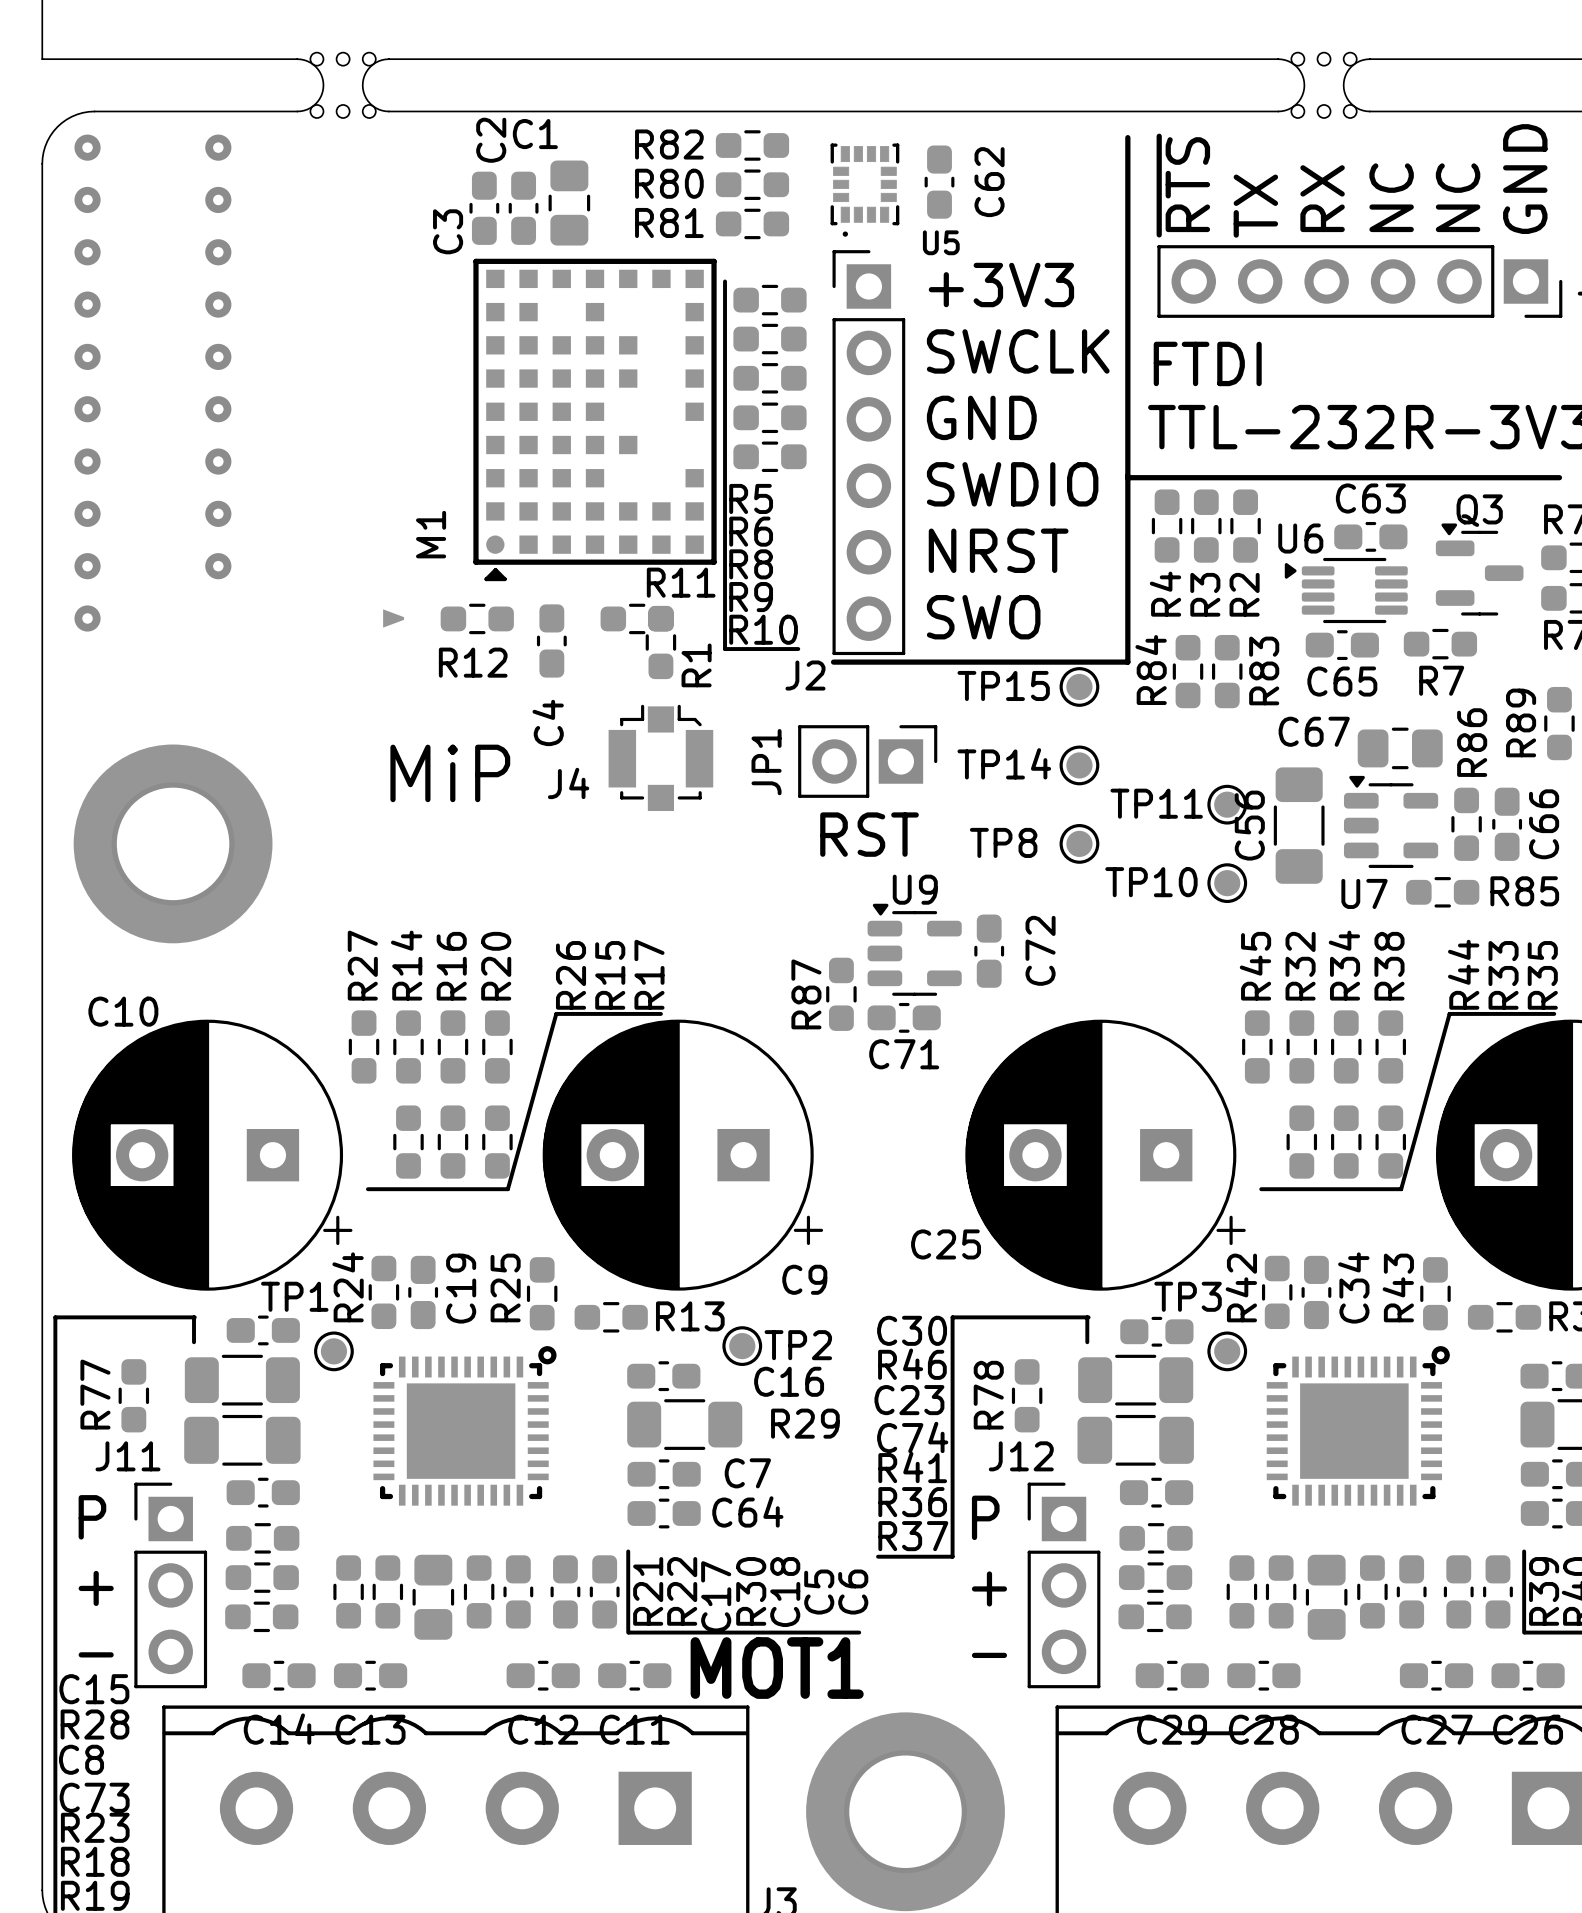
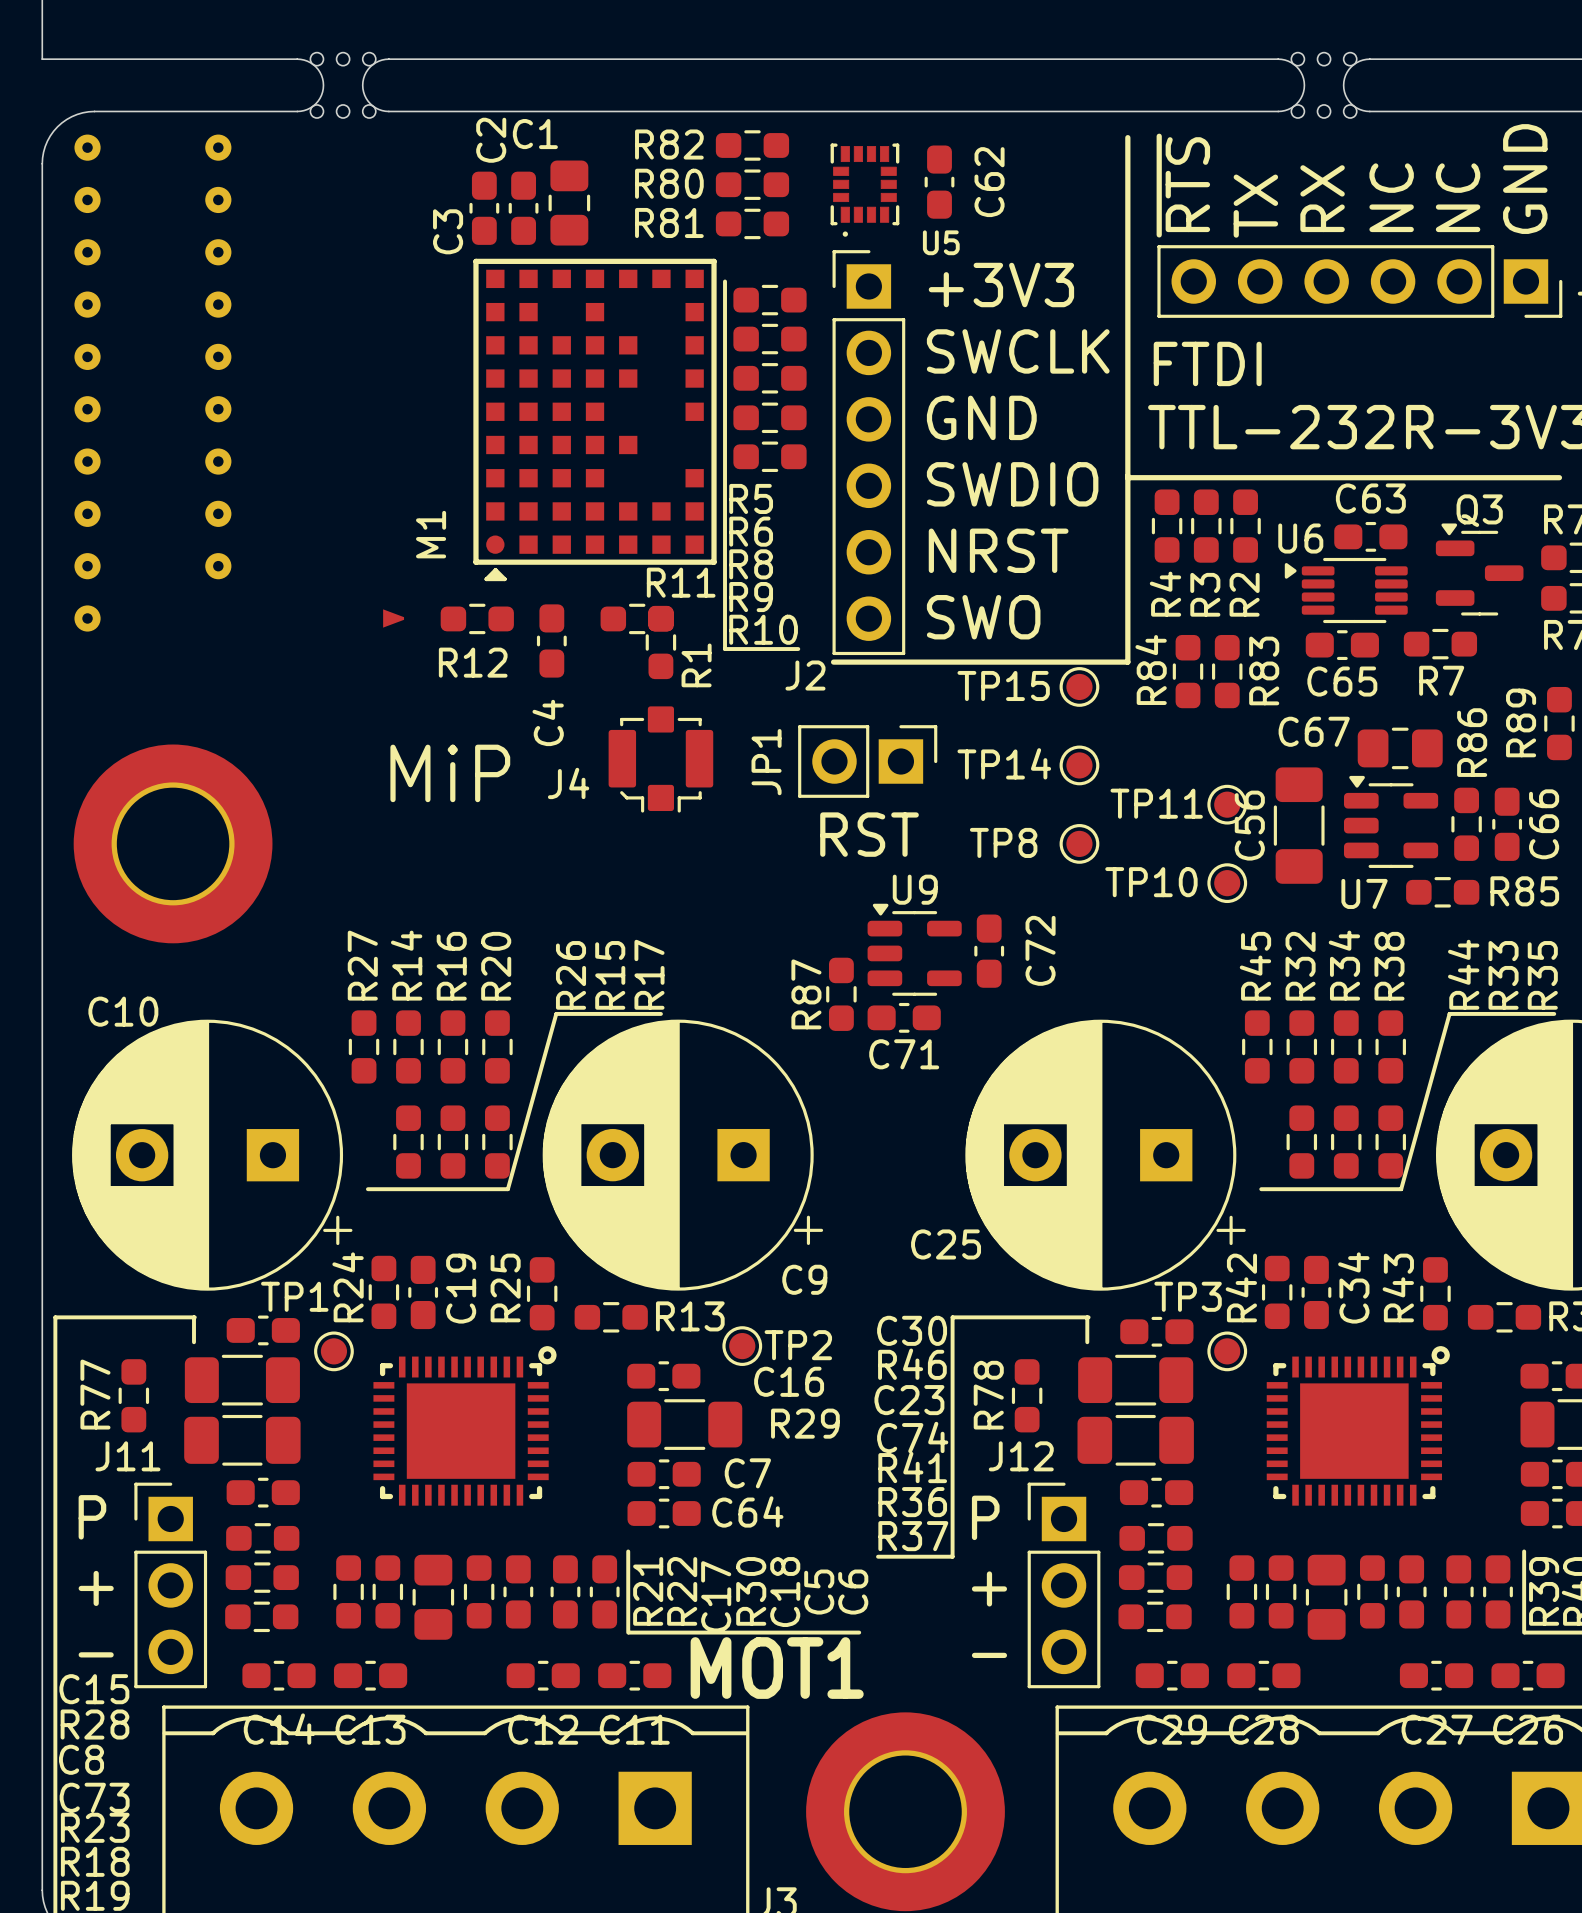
J4 footprint: [608, 704, 714, 812] -> [608, 706, 714, 813]

